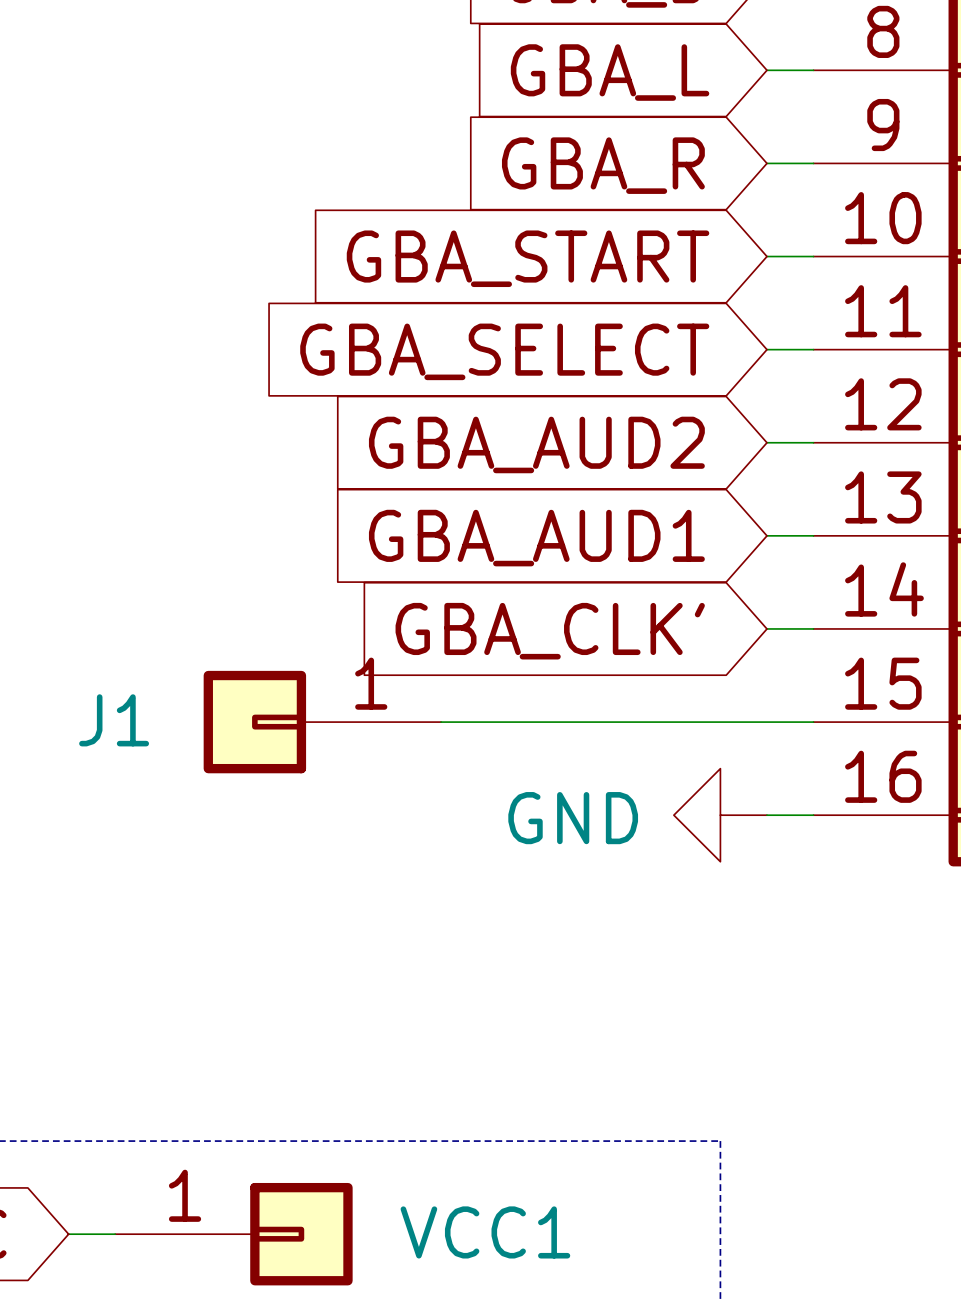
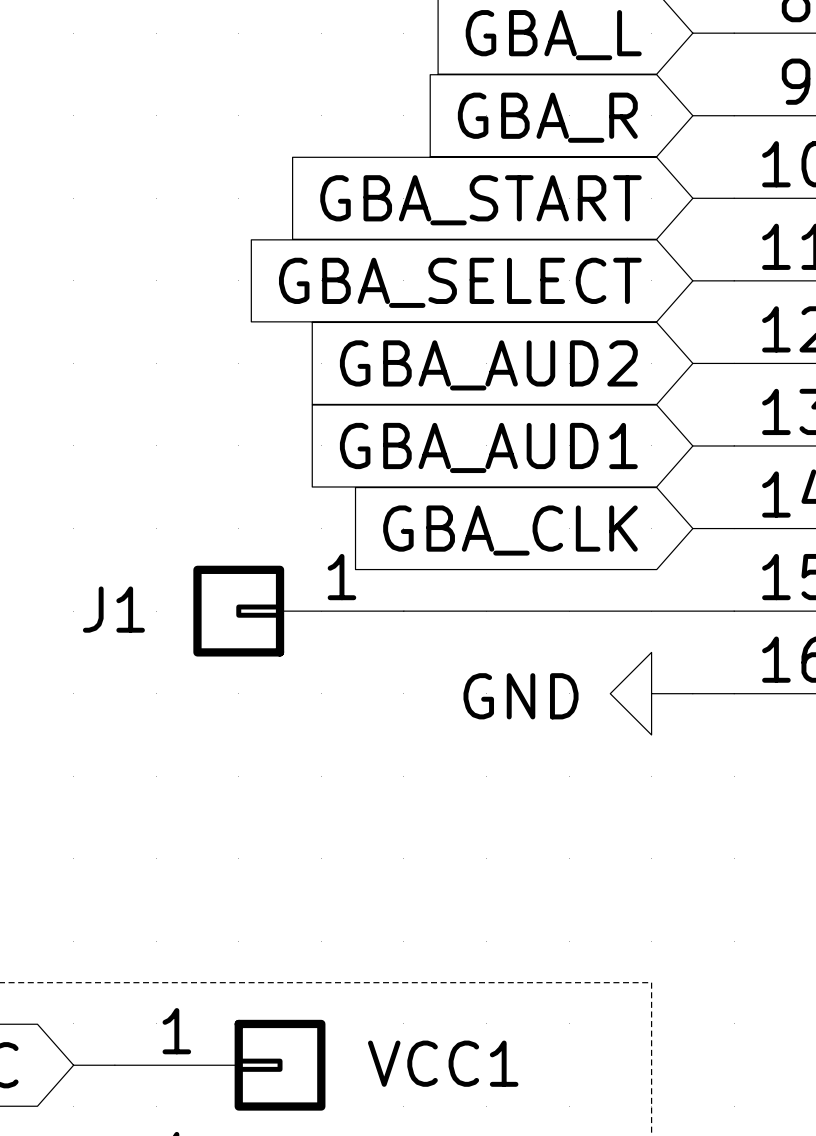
global label: GBA_CLK' (550, 631) -> GBA_CLK (510, 530)

